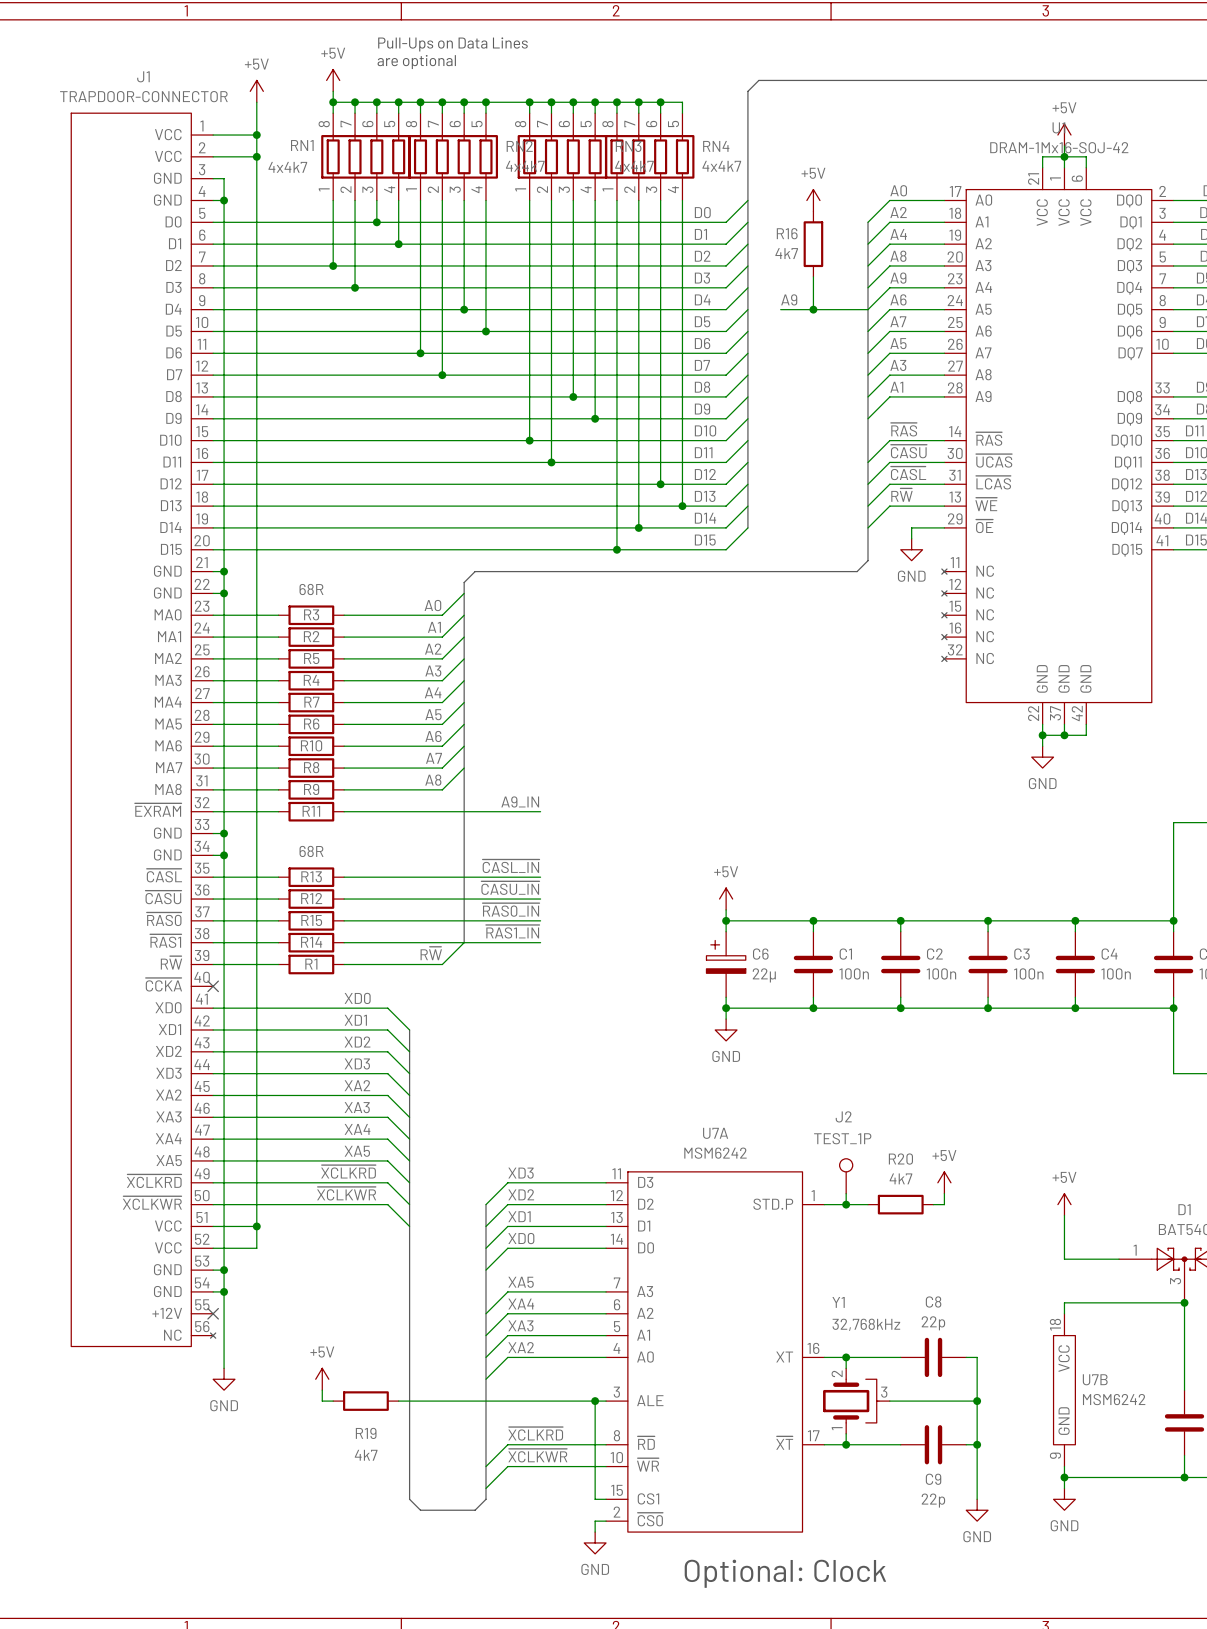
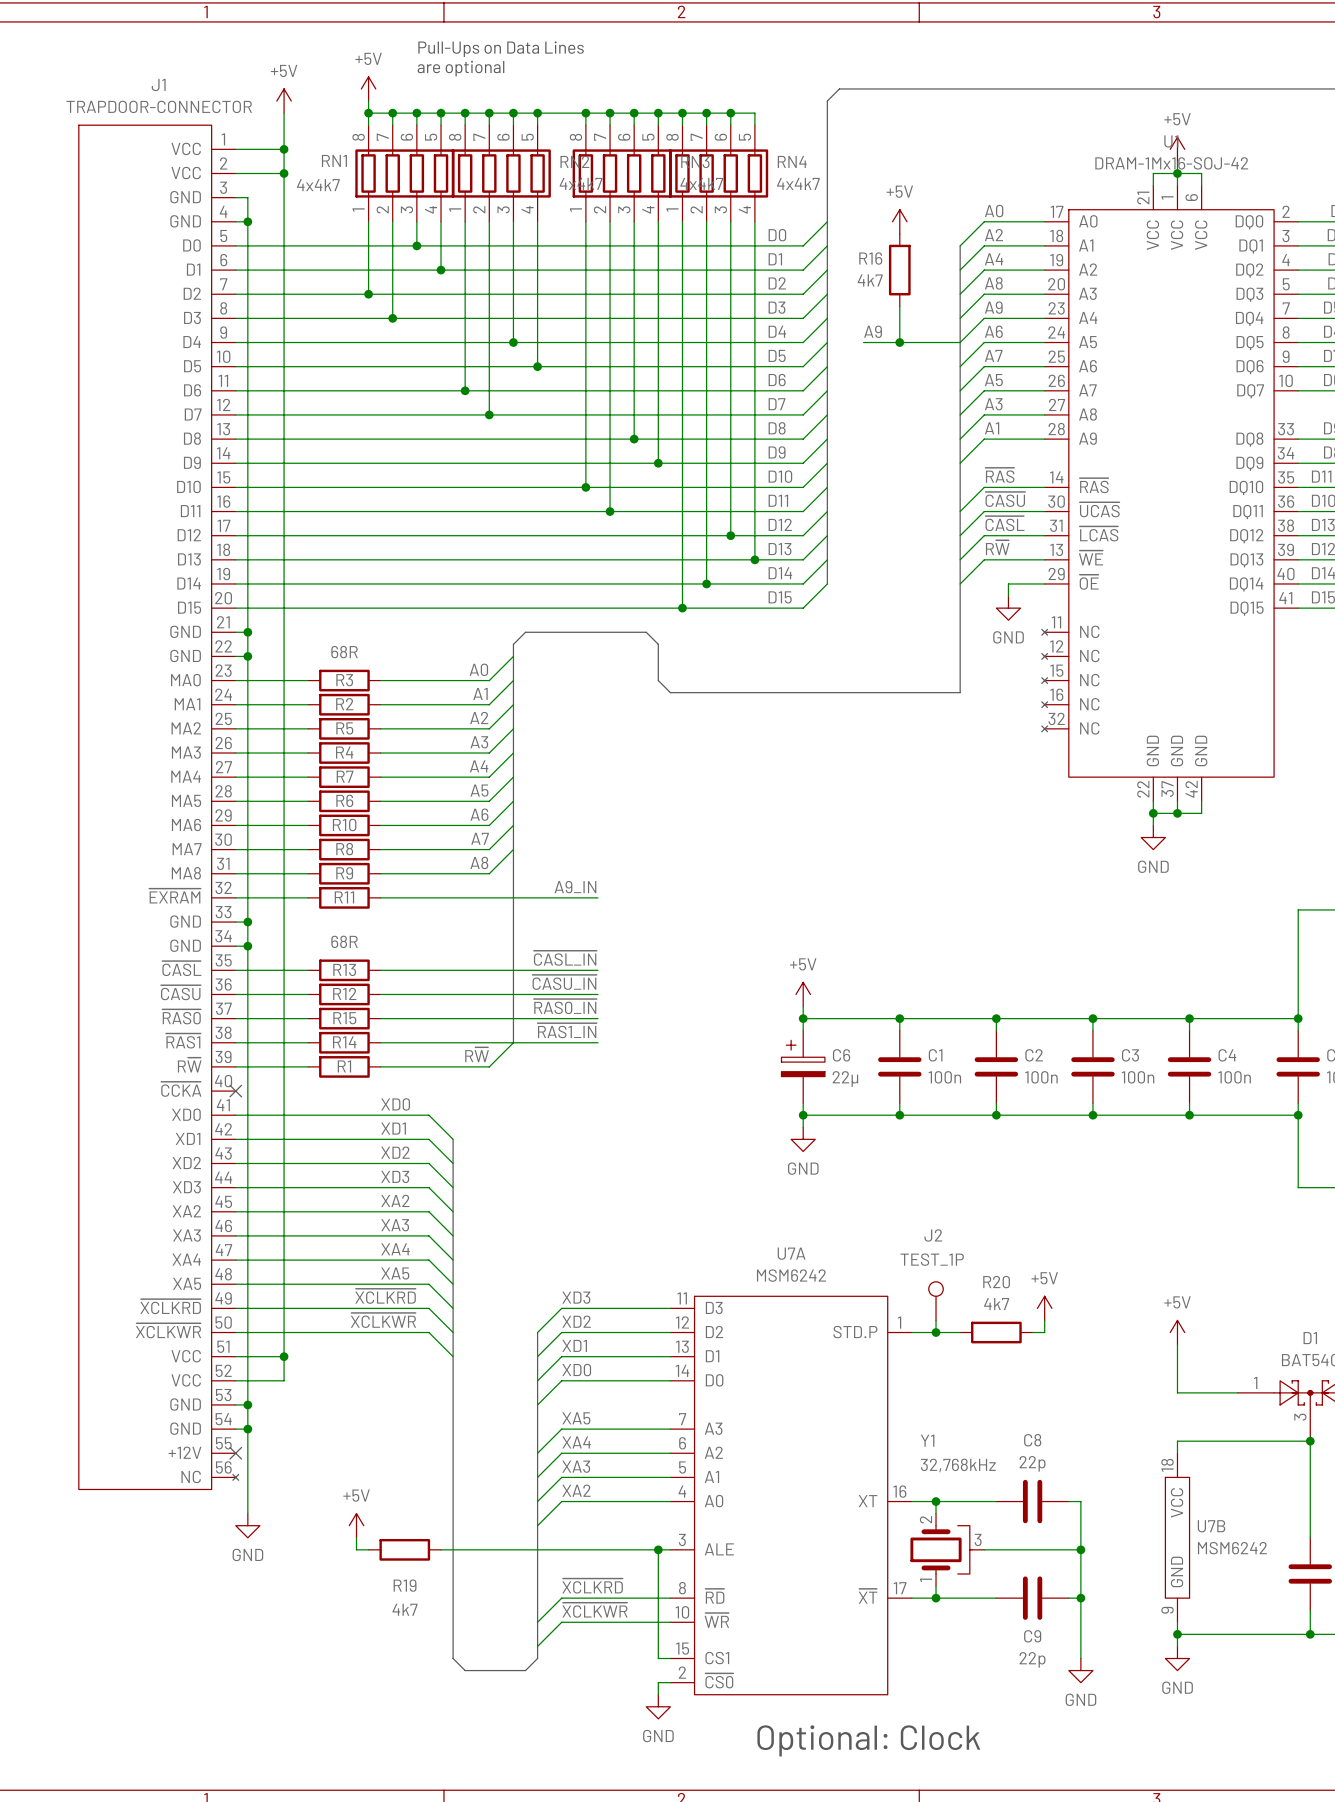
bus: (868, 560) (857, 571) (584, 571) -> (960, 620) (960, 692) (670, 692) (658, 680) (658, 644) (646, 632)

